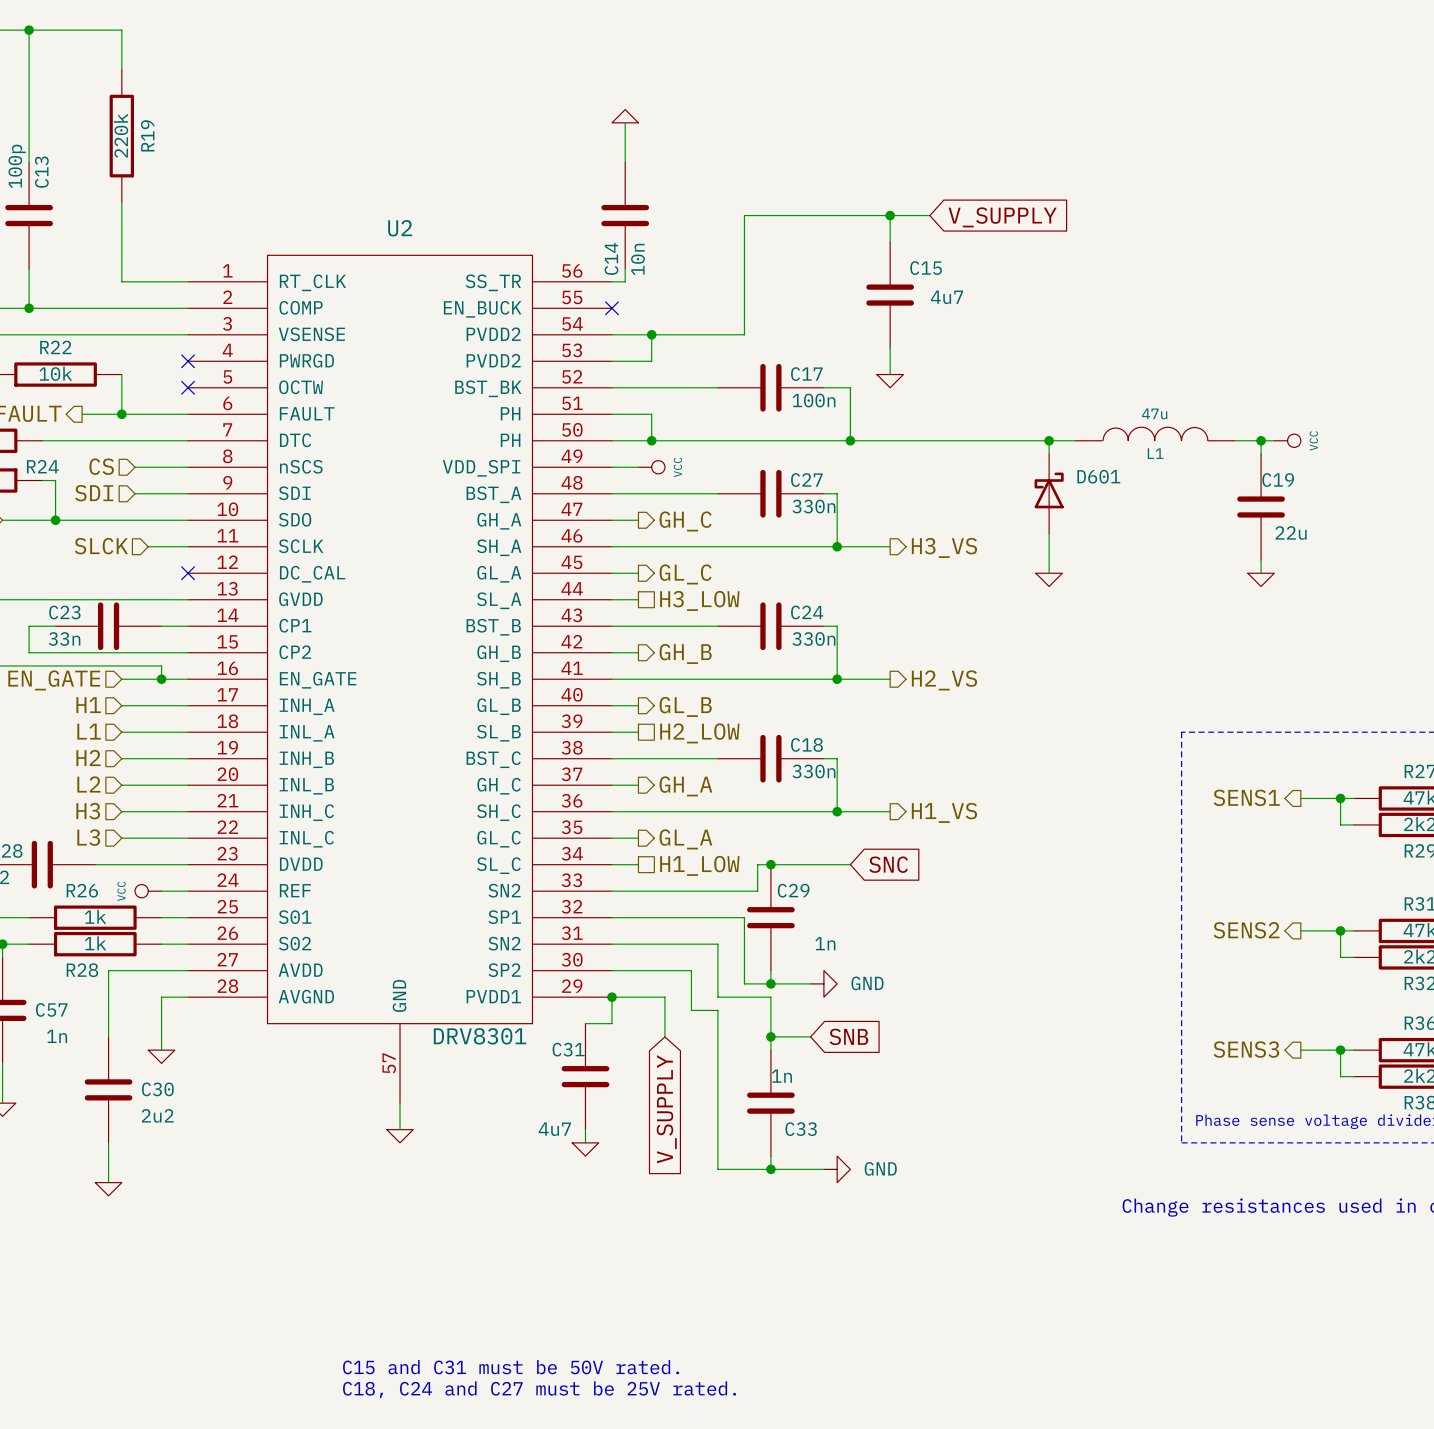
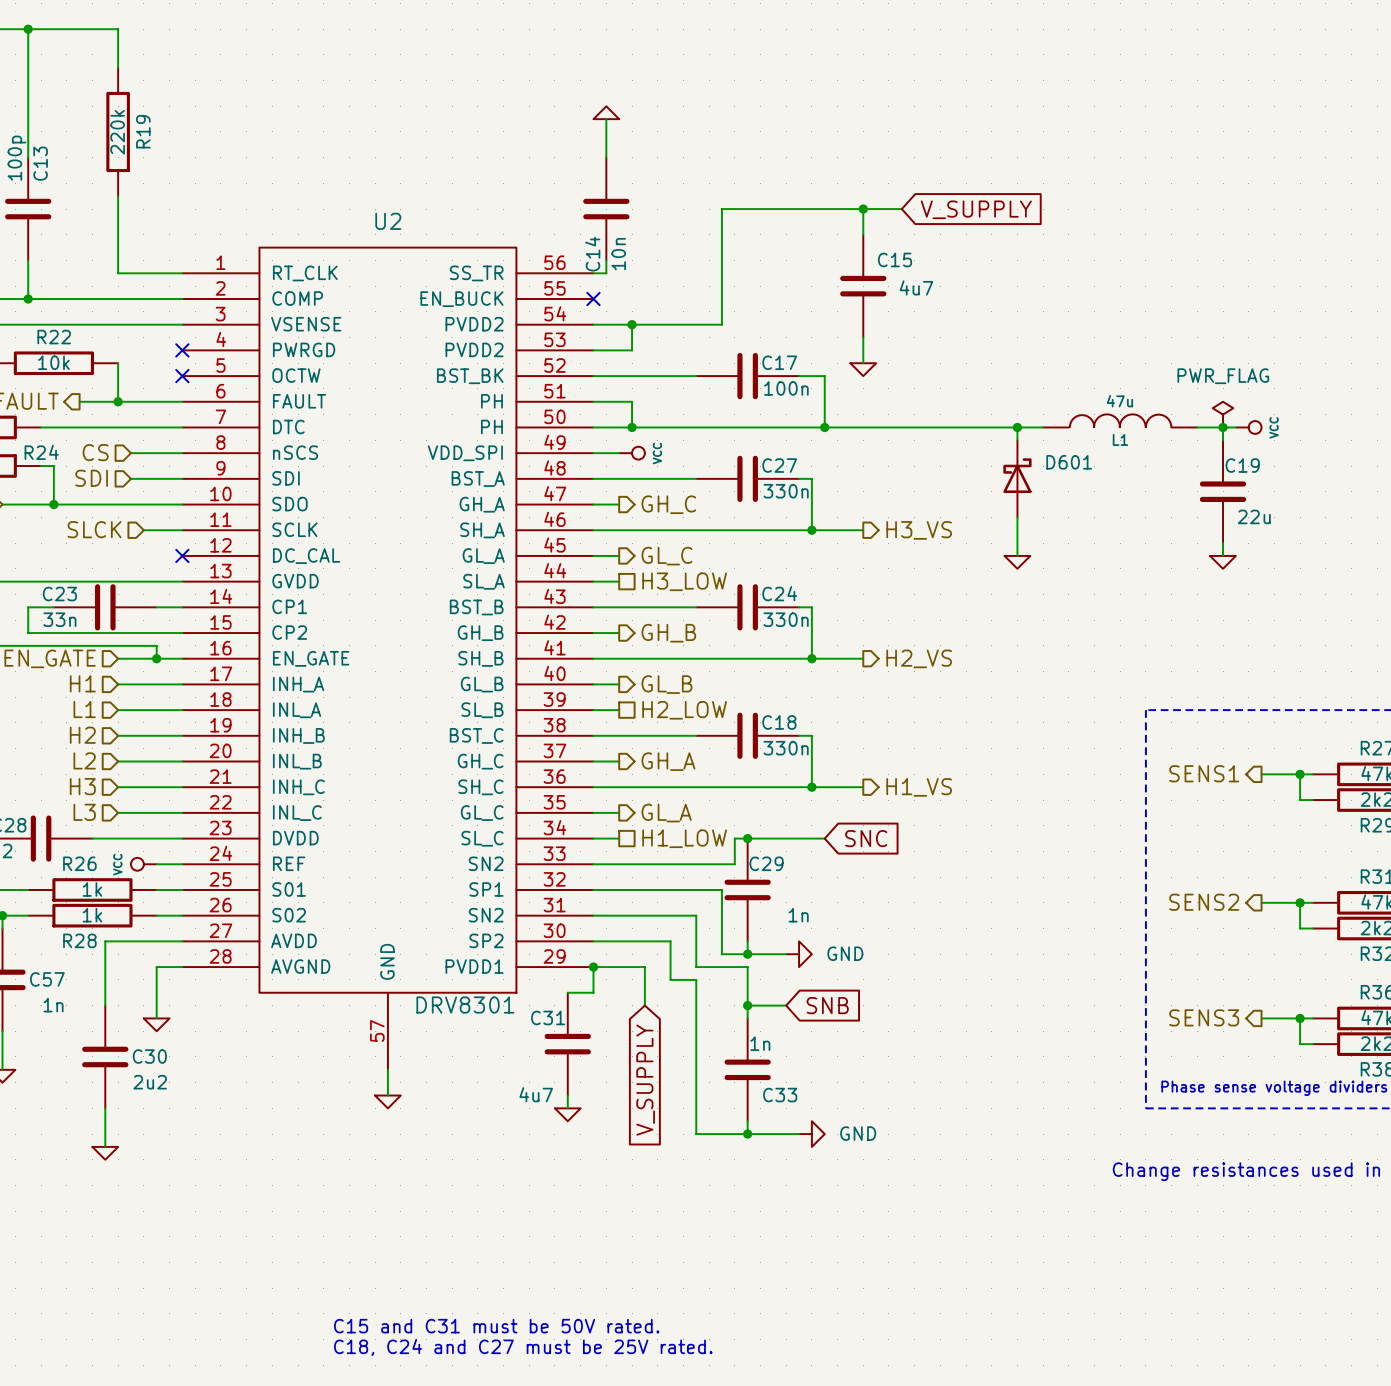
power symbol: none -> PWR_FLAG (1223, 414)

